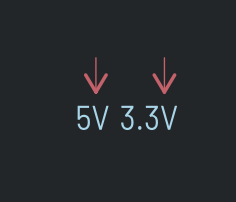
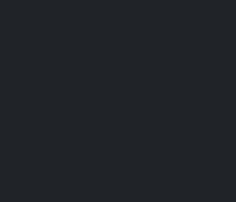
power symbol: 5V (95, 75) -> none
power symbol: 3.3V (164, 75) -> none

